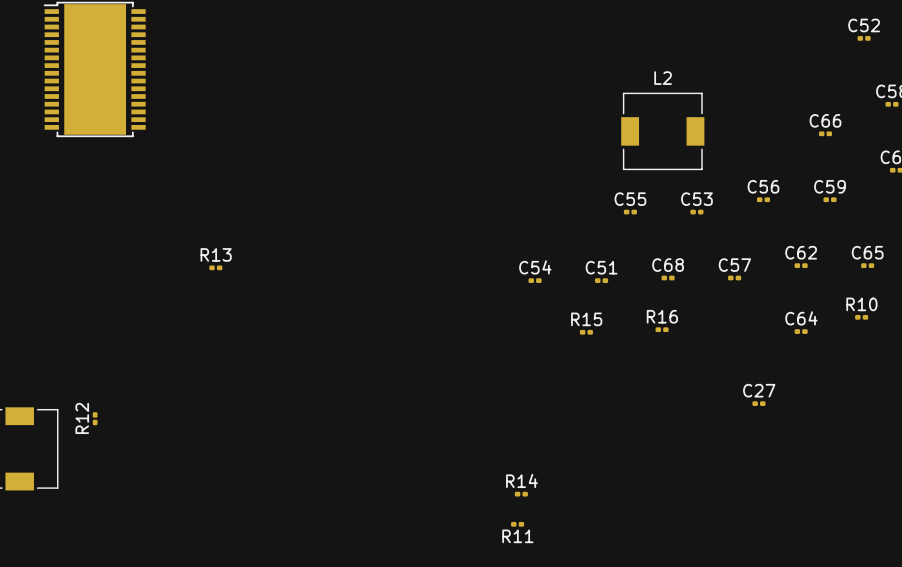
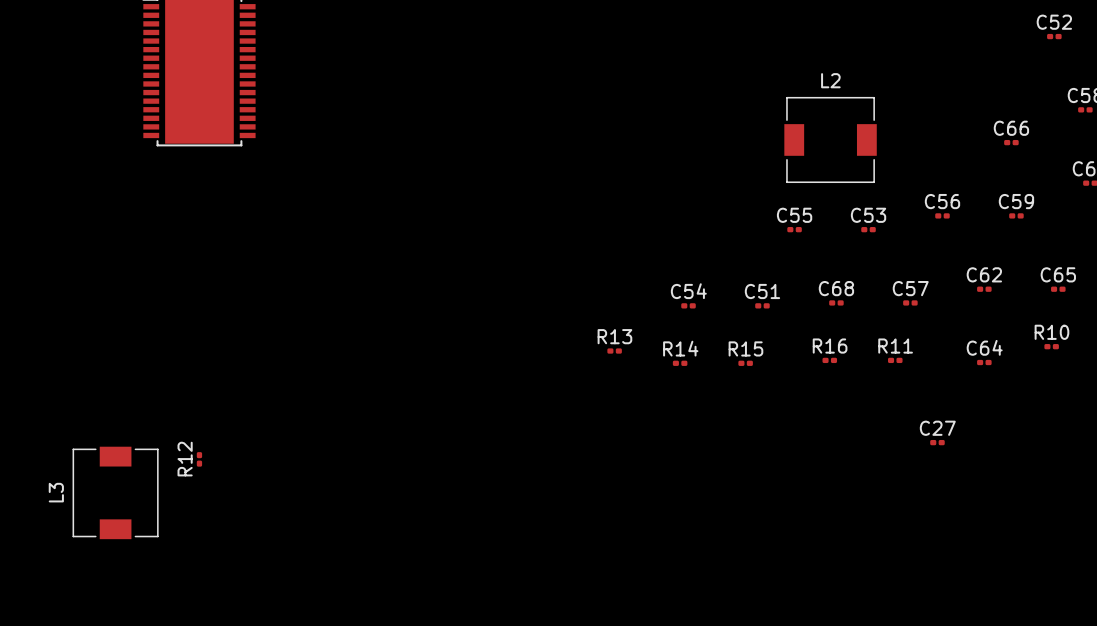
R13 position: (215, 267) -> (614, 351)
R14 position: (521, 494) -> (680, 363)
R11 position: (517, 524) -> (895, 360)
R11 name position: R11 (517, 536) -> R11 (895, 346)

